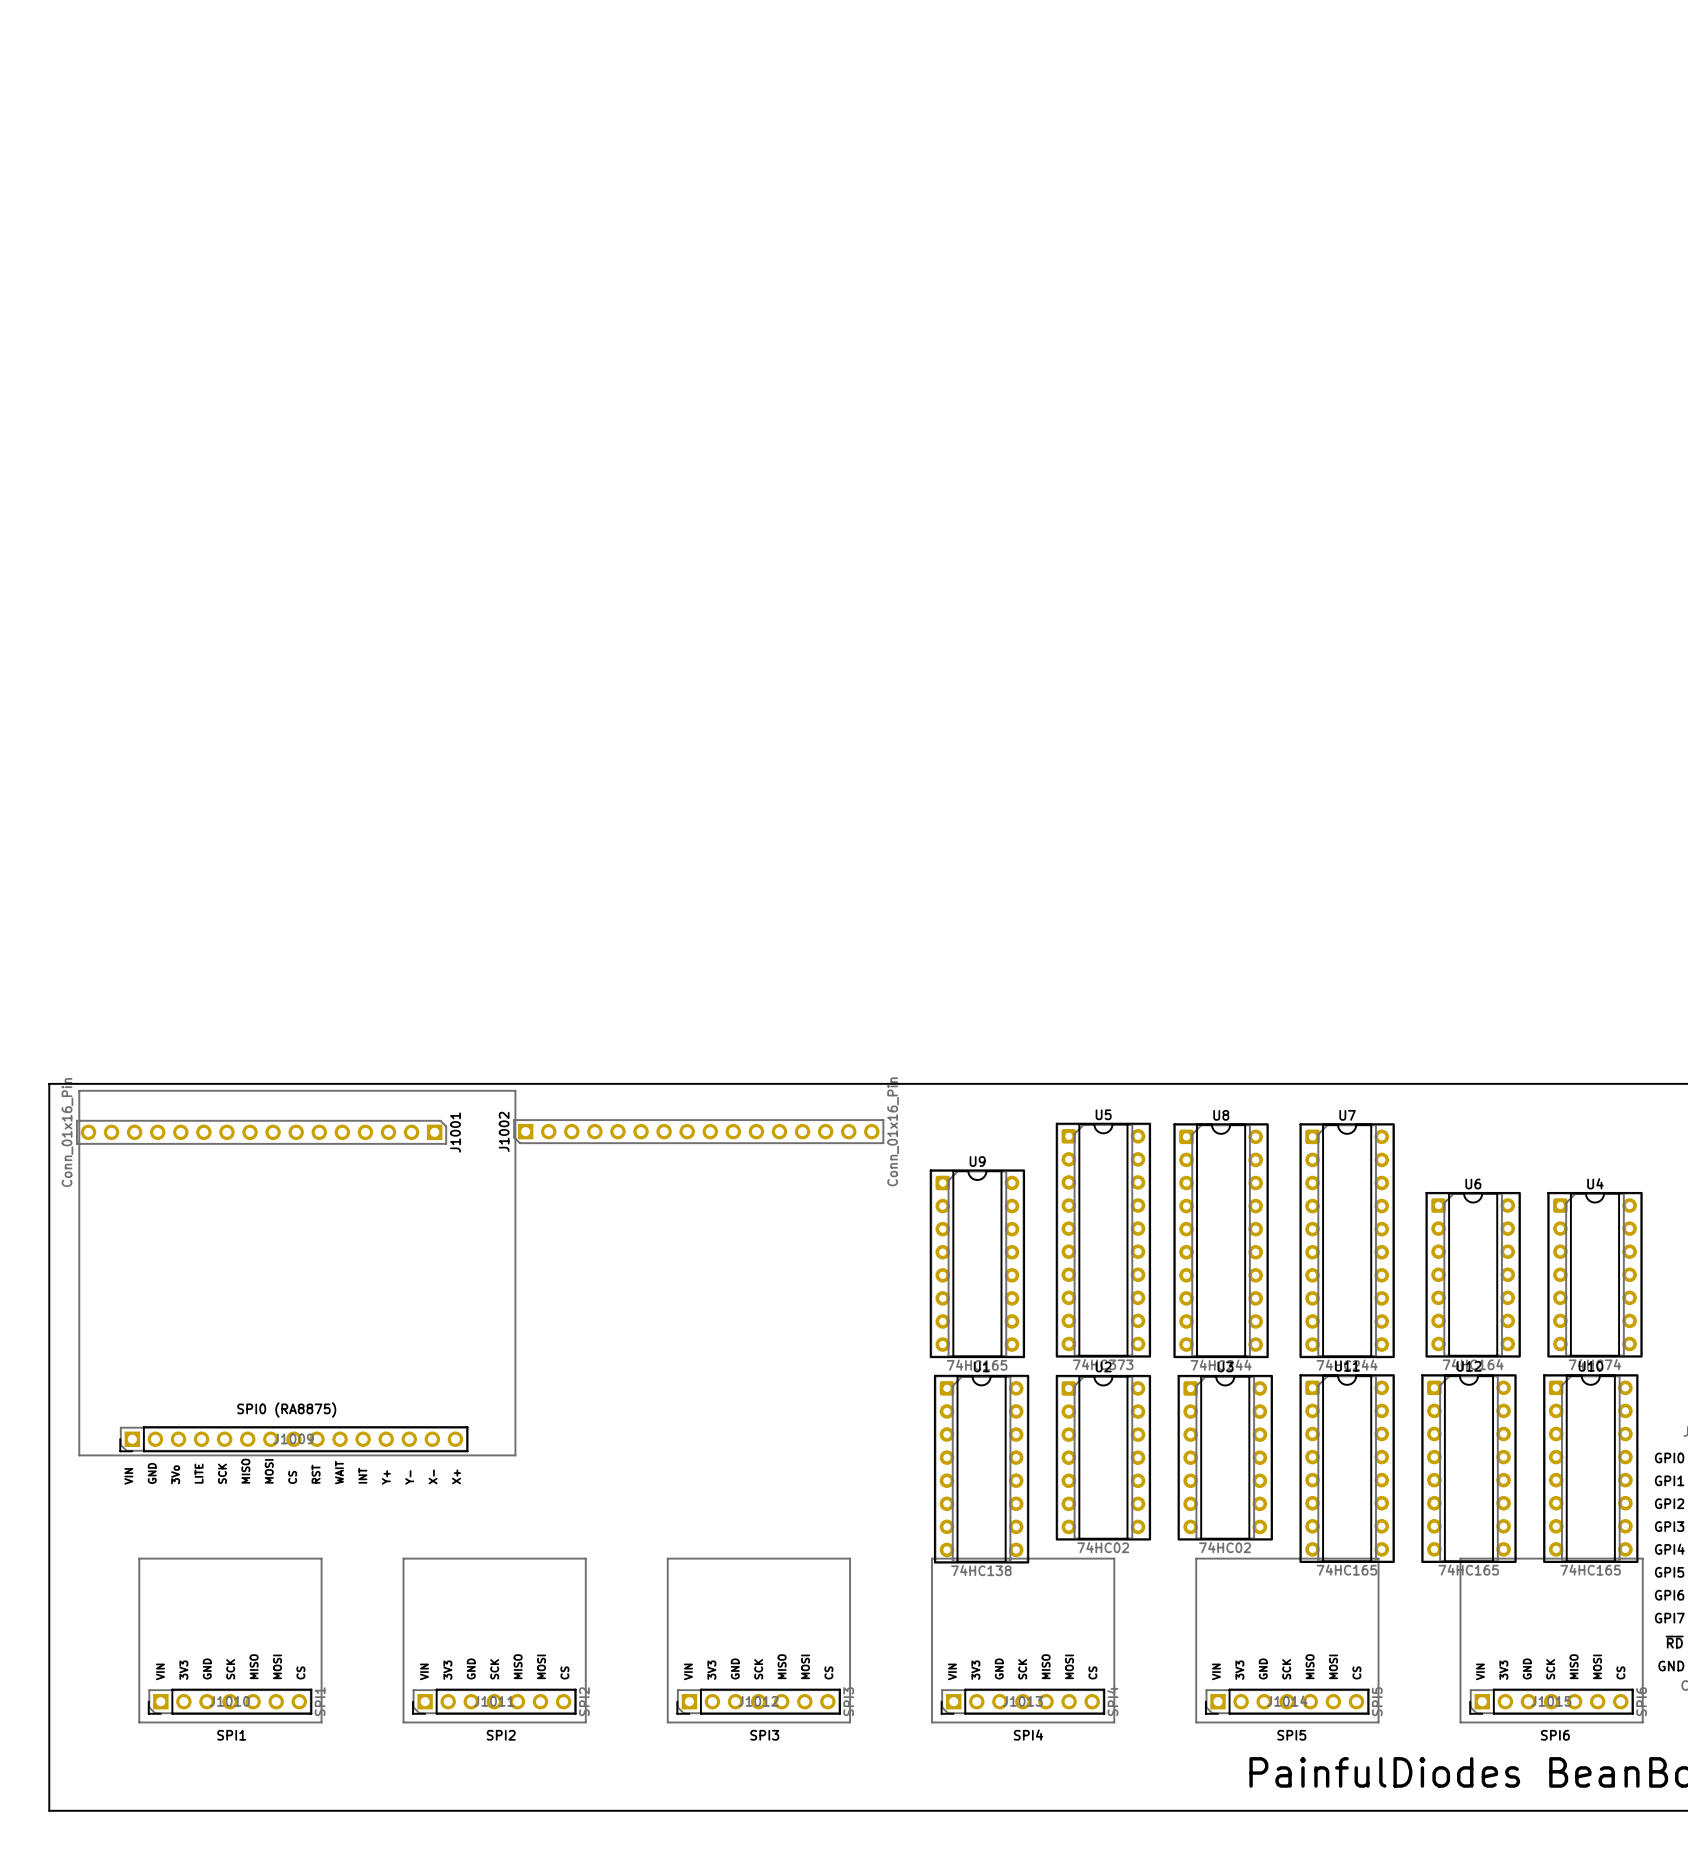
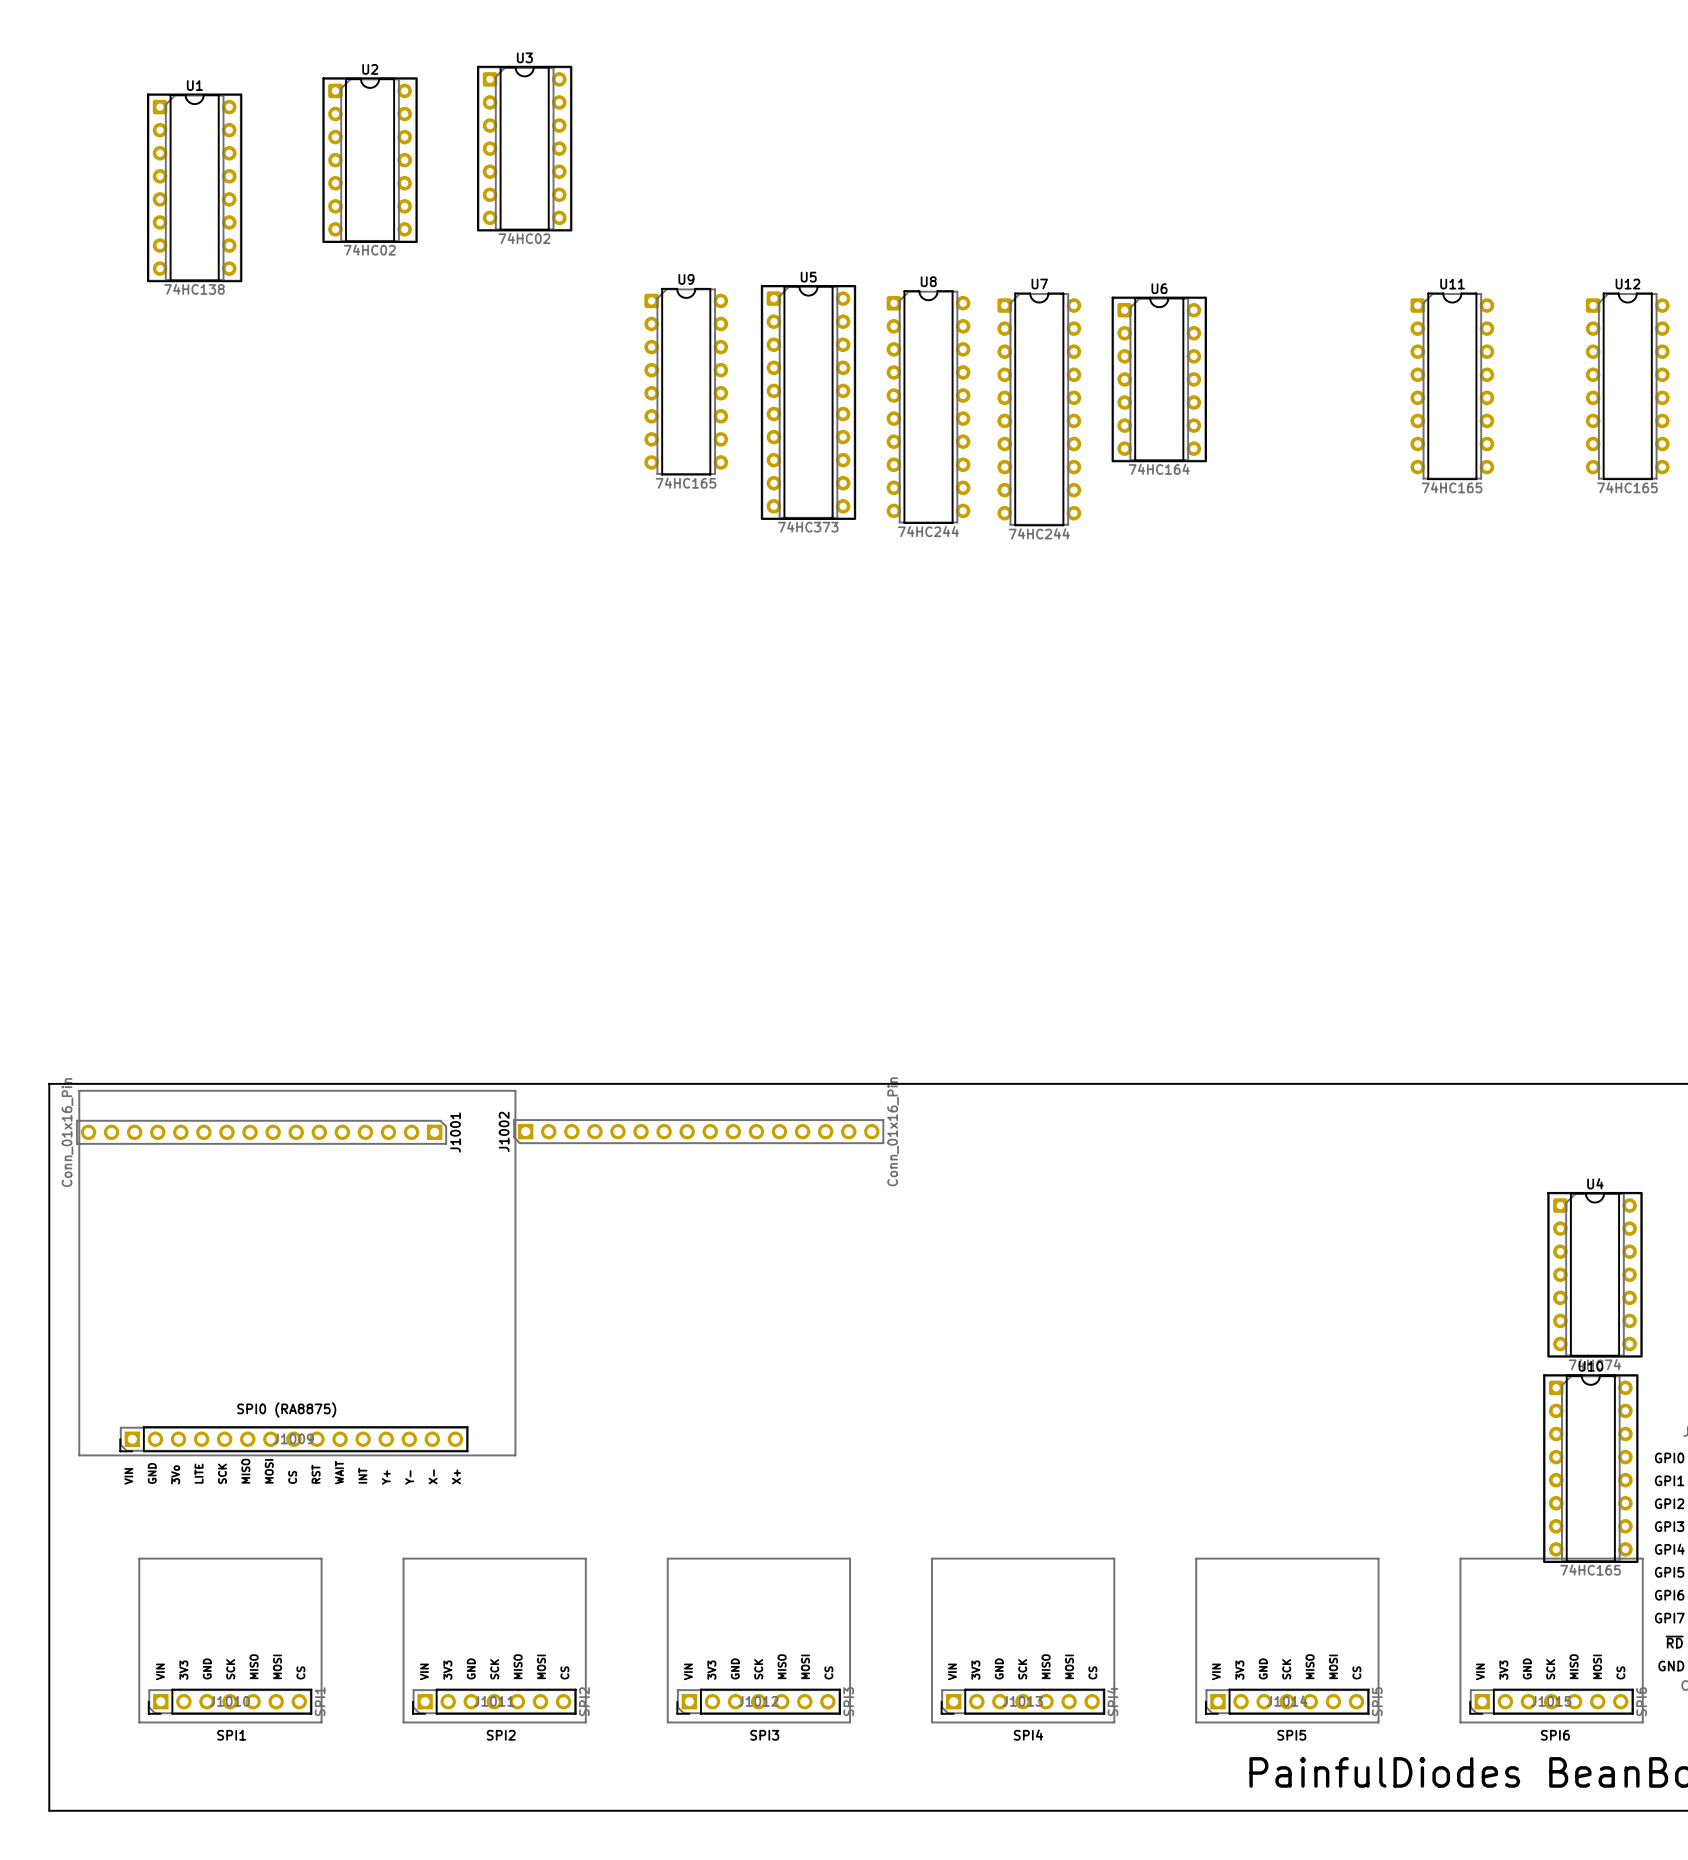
U8 footprint: [1173, 1123, 1269, 1358] -> [886, 290, 971, 524]
U7 footprint: [1299, 1123, 1395, 1358] -> [997, 292, 1082, 526]
U9 footprint: [930, 1169, 1025, 1358] -> [644, 288, 729, 476]
U5 position: (1103, 1240) -> (808, 402)
U6 position: (1473, 1274) -> (1159, 379)
U11 footprint: [1299, 1374, 1395, 1563] -> [1410, 292, 1495, 480]
U12 footprint: [1421, 1374, 1517, 1563] -> [1585, 292, 1670, 480]
U2 position: (1103, 1457) -> (370, 160)
U3 position: (1225, 1457) -> (524, 148)
U1 position: (981, 1469) -> (194, 187)

